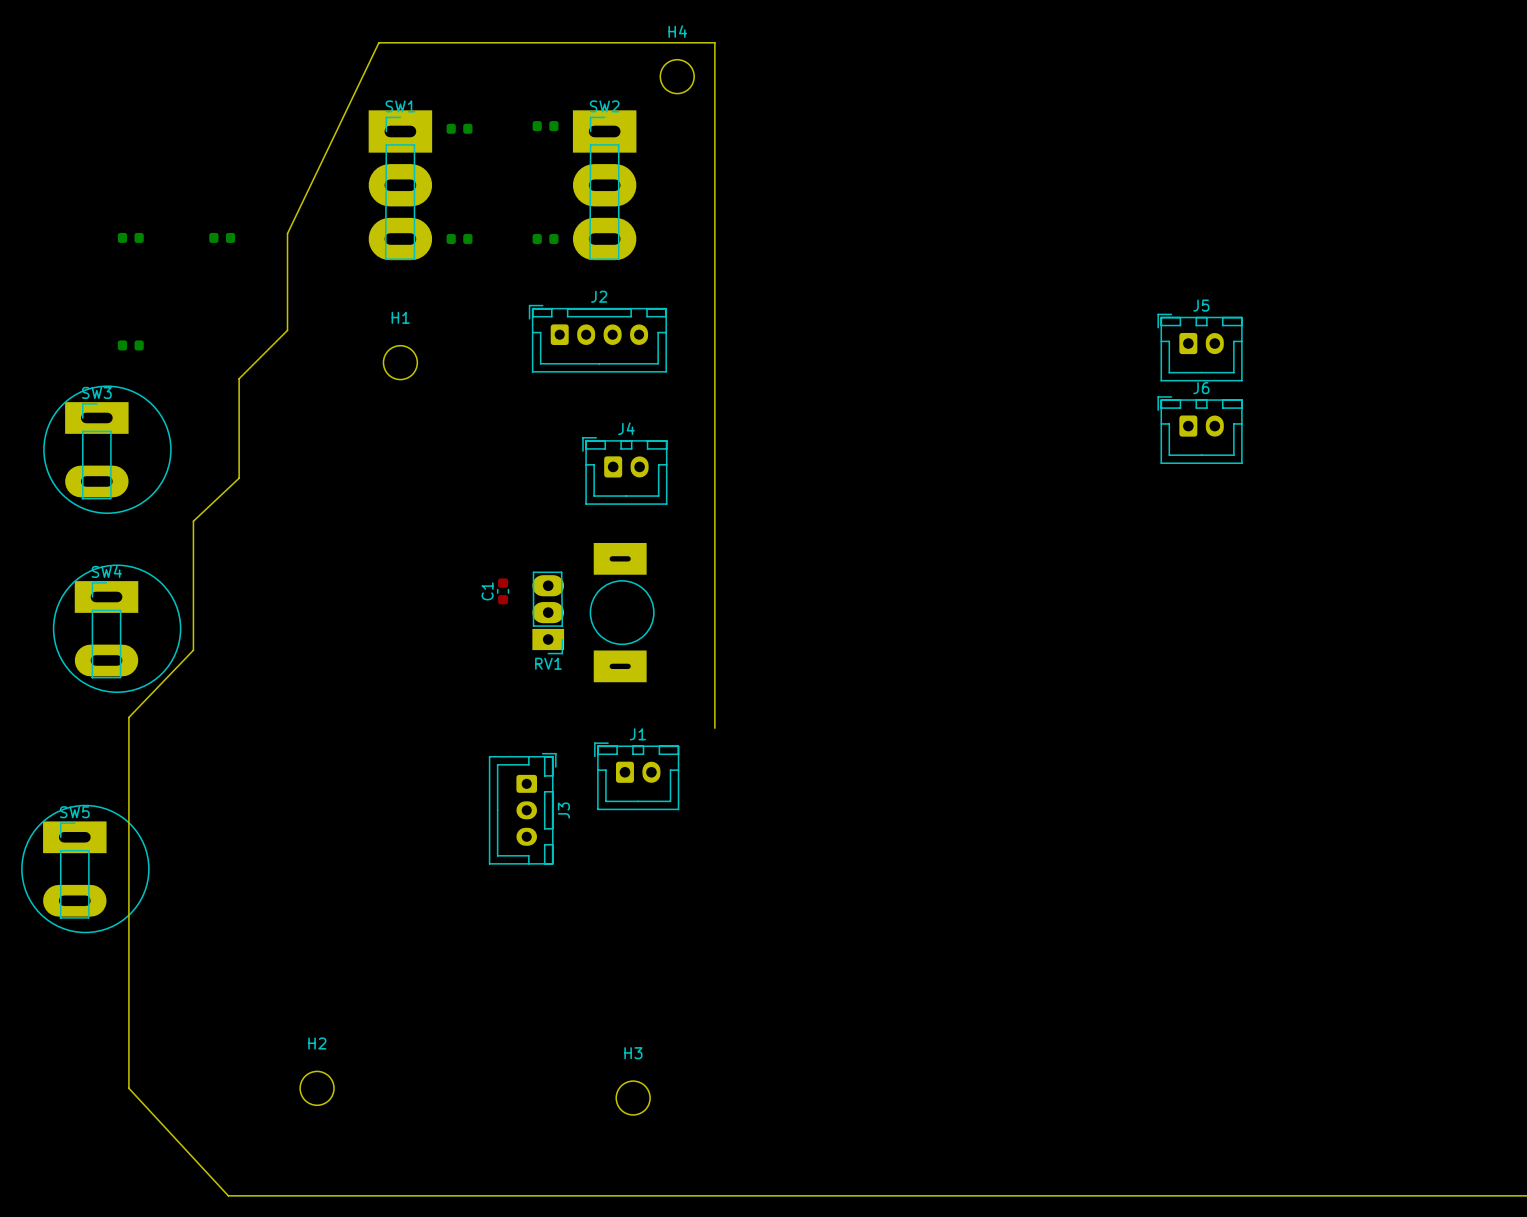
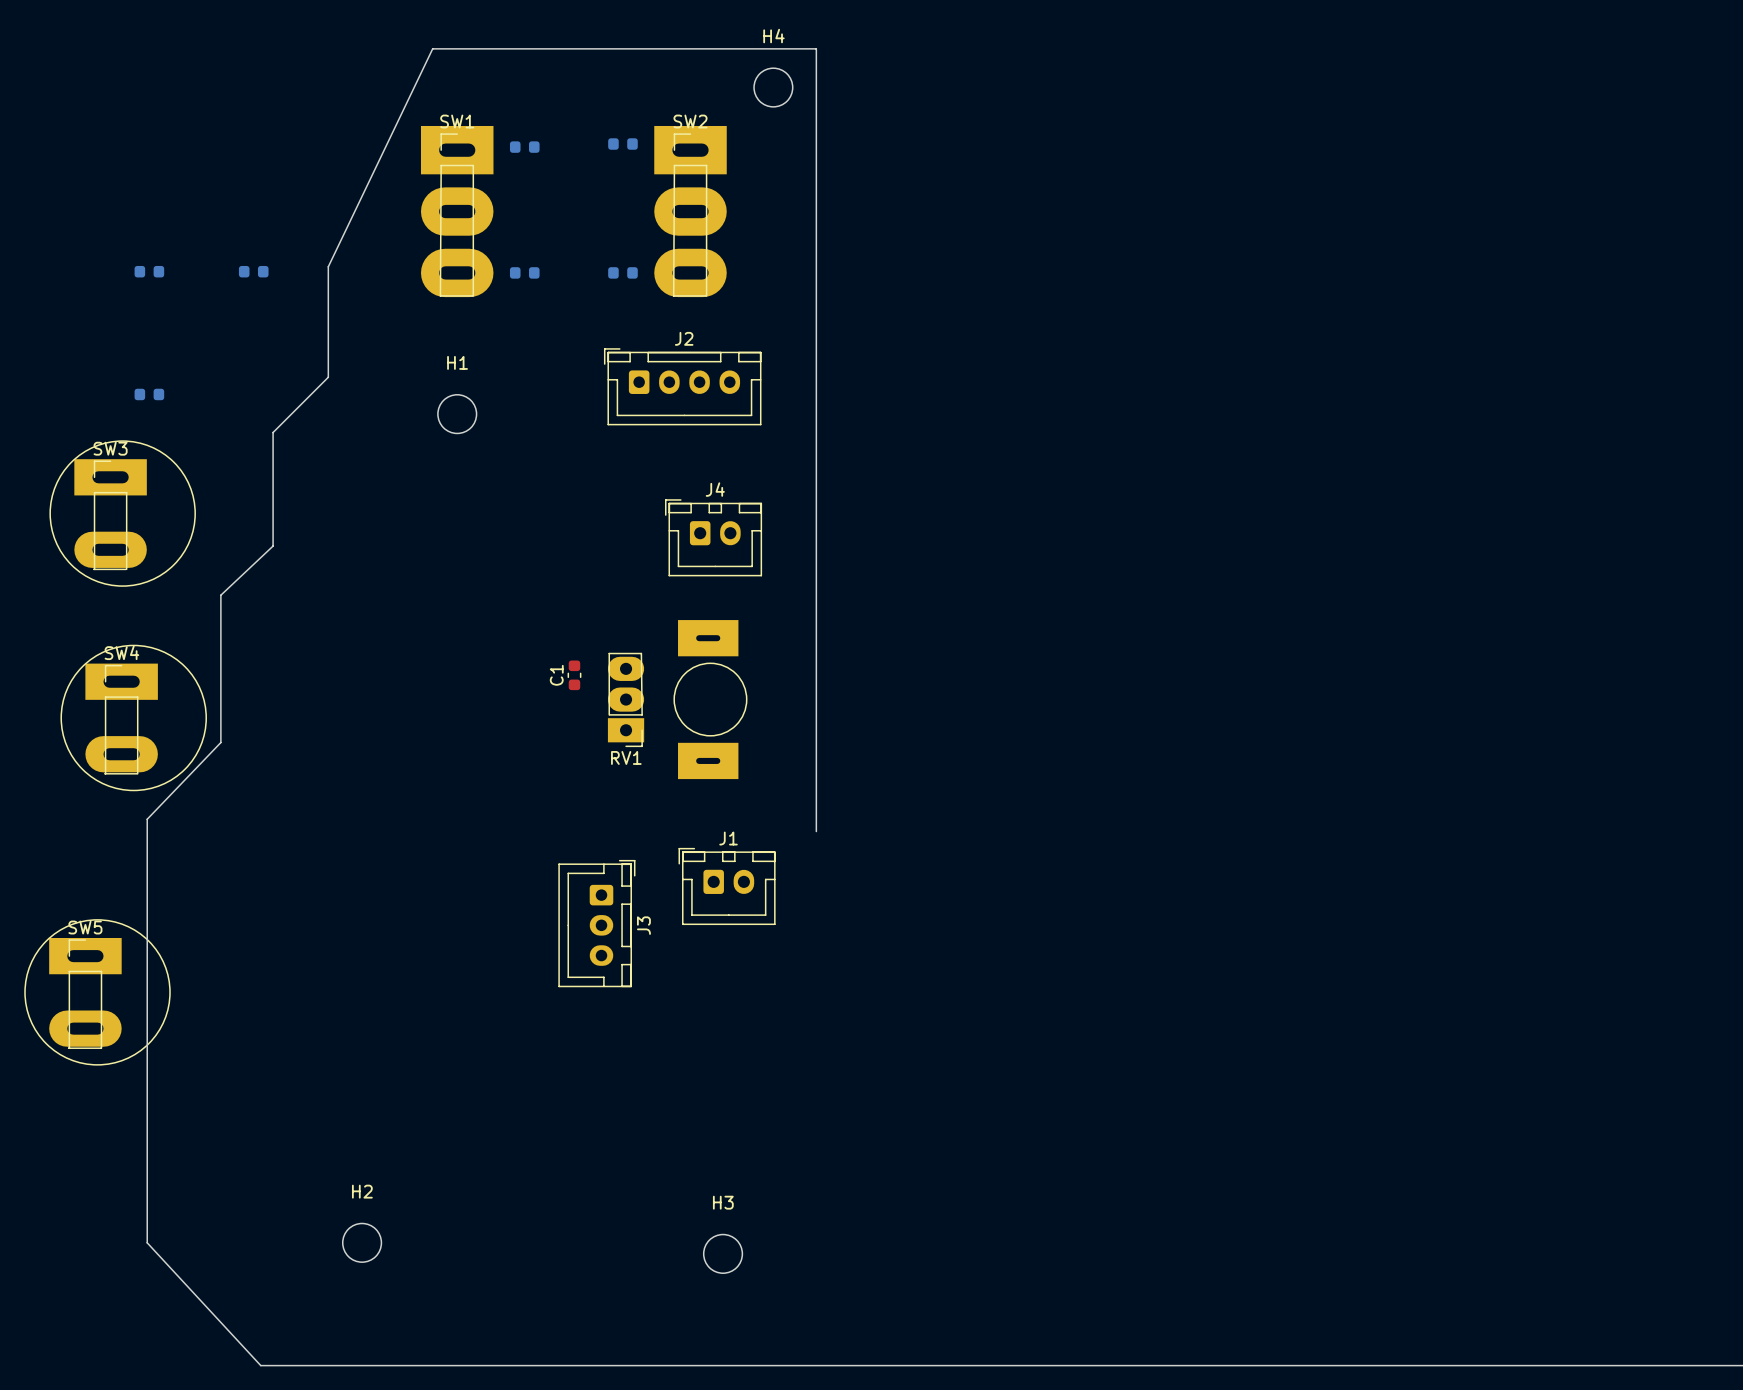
J5: (1200, 347) -> none
J6: (1200, 430) -> none

